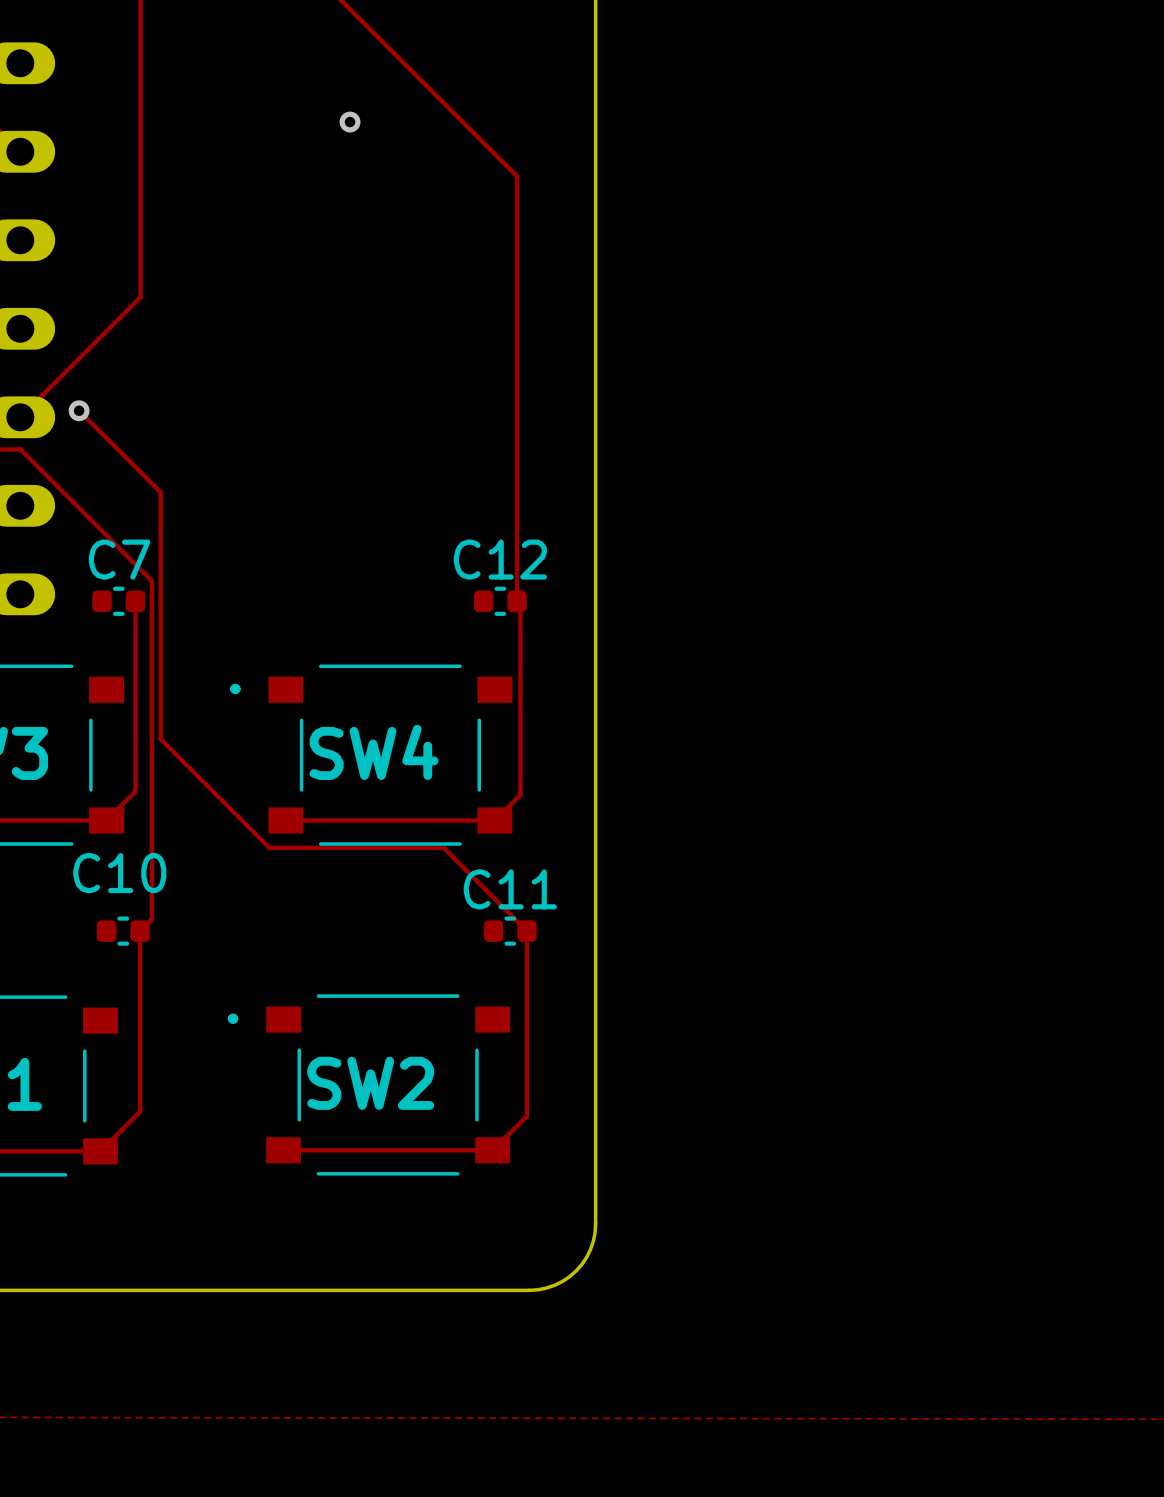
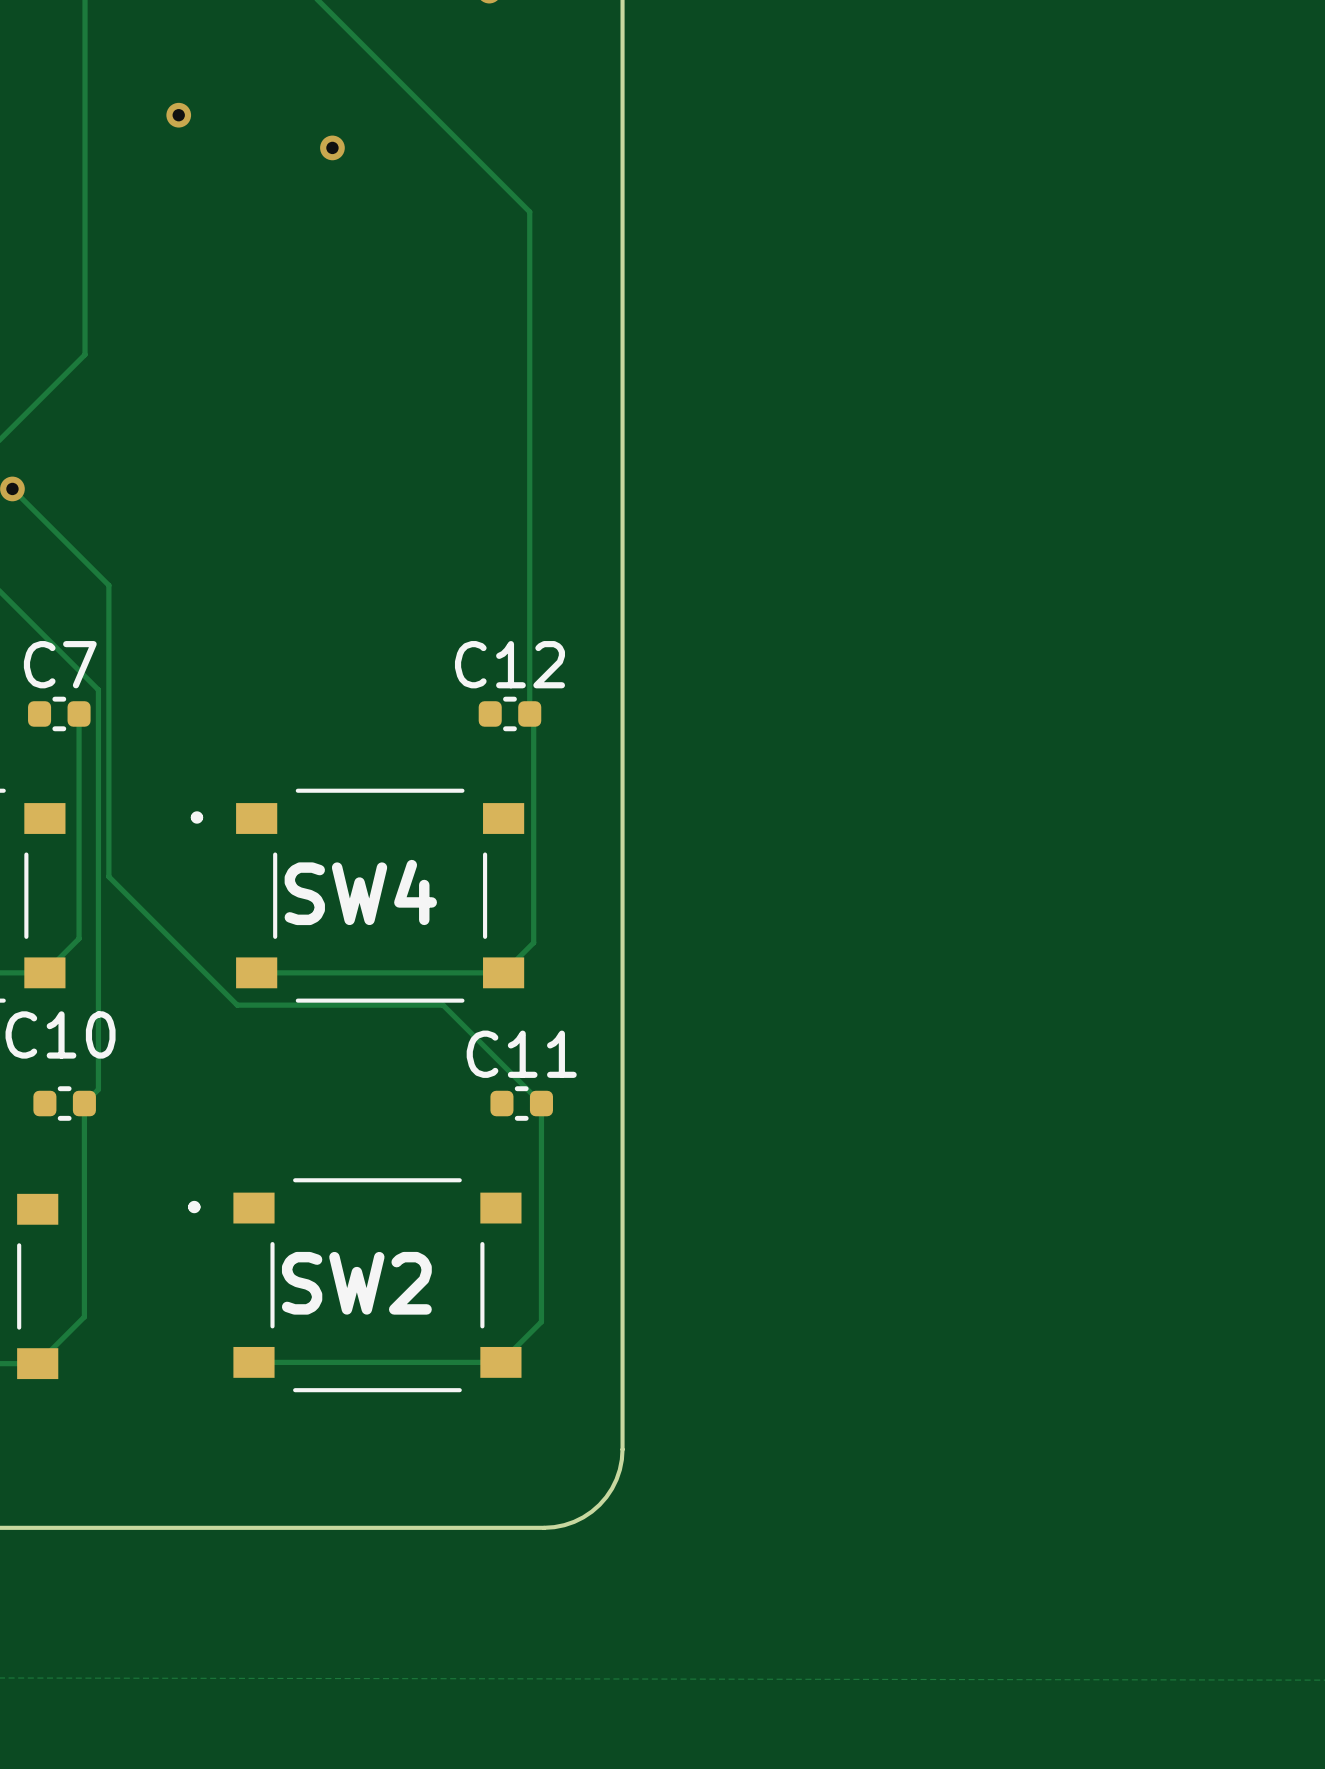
via: none -> (178, 115)

